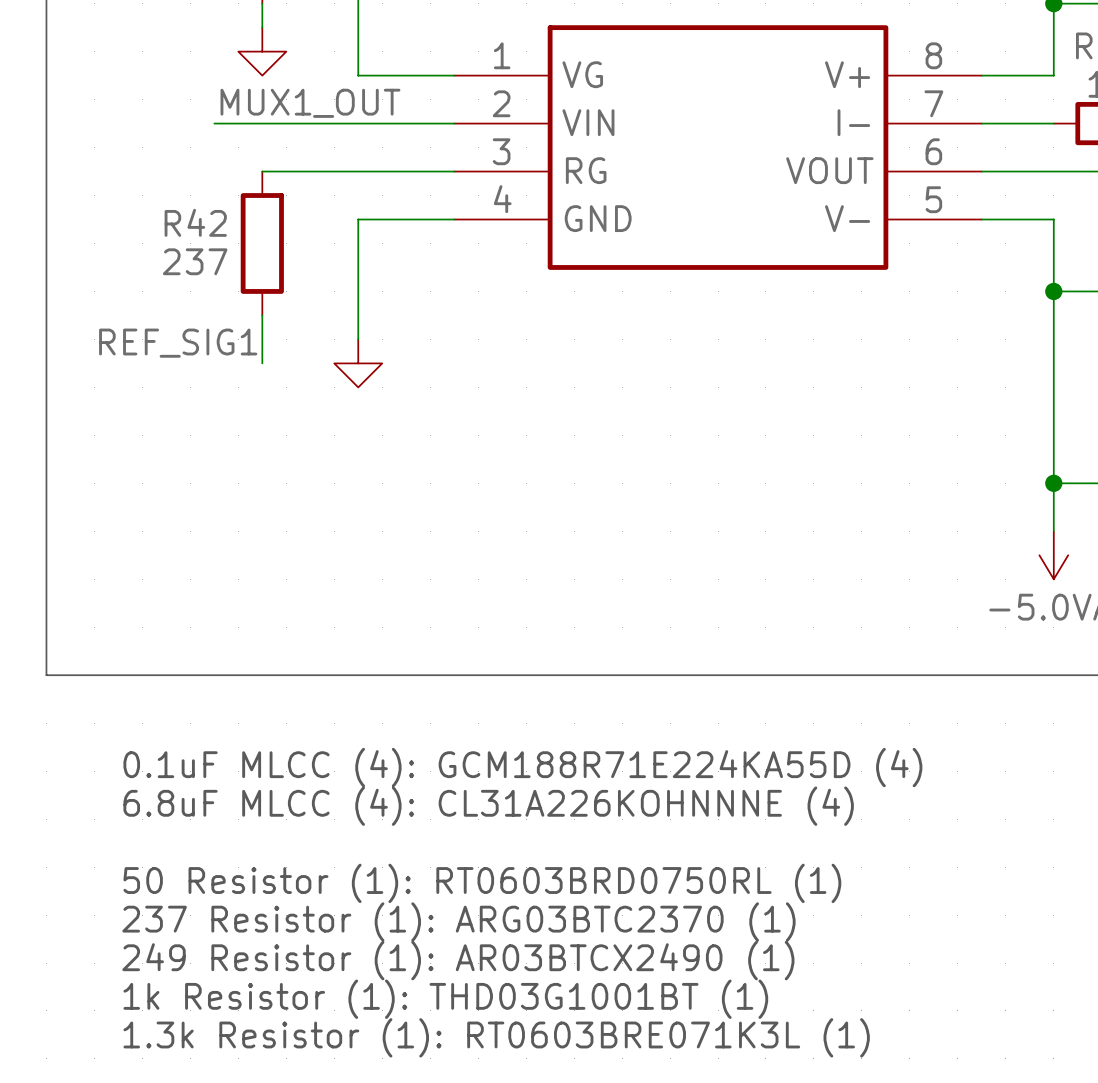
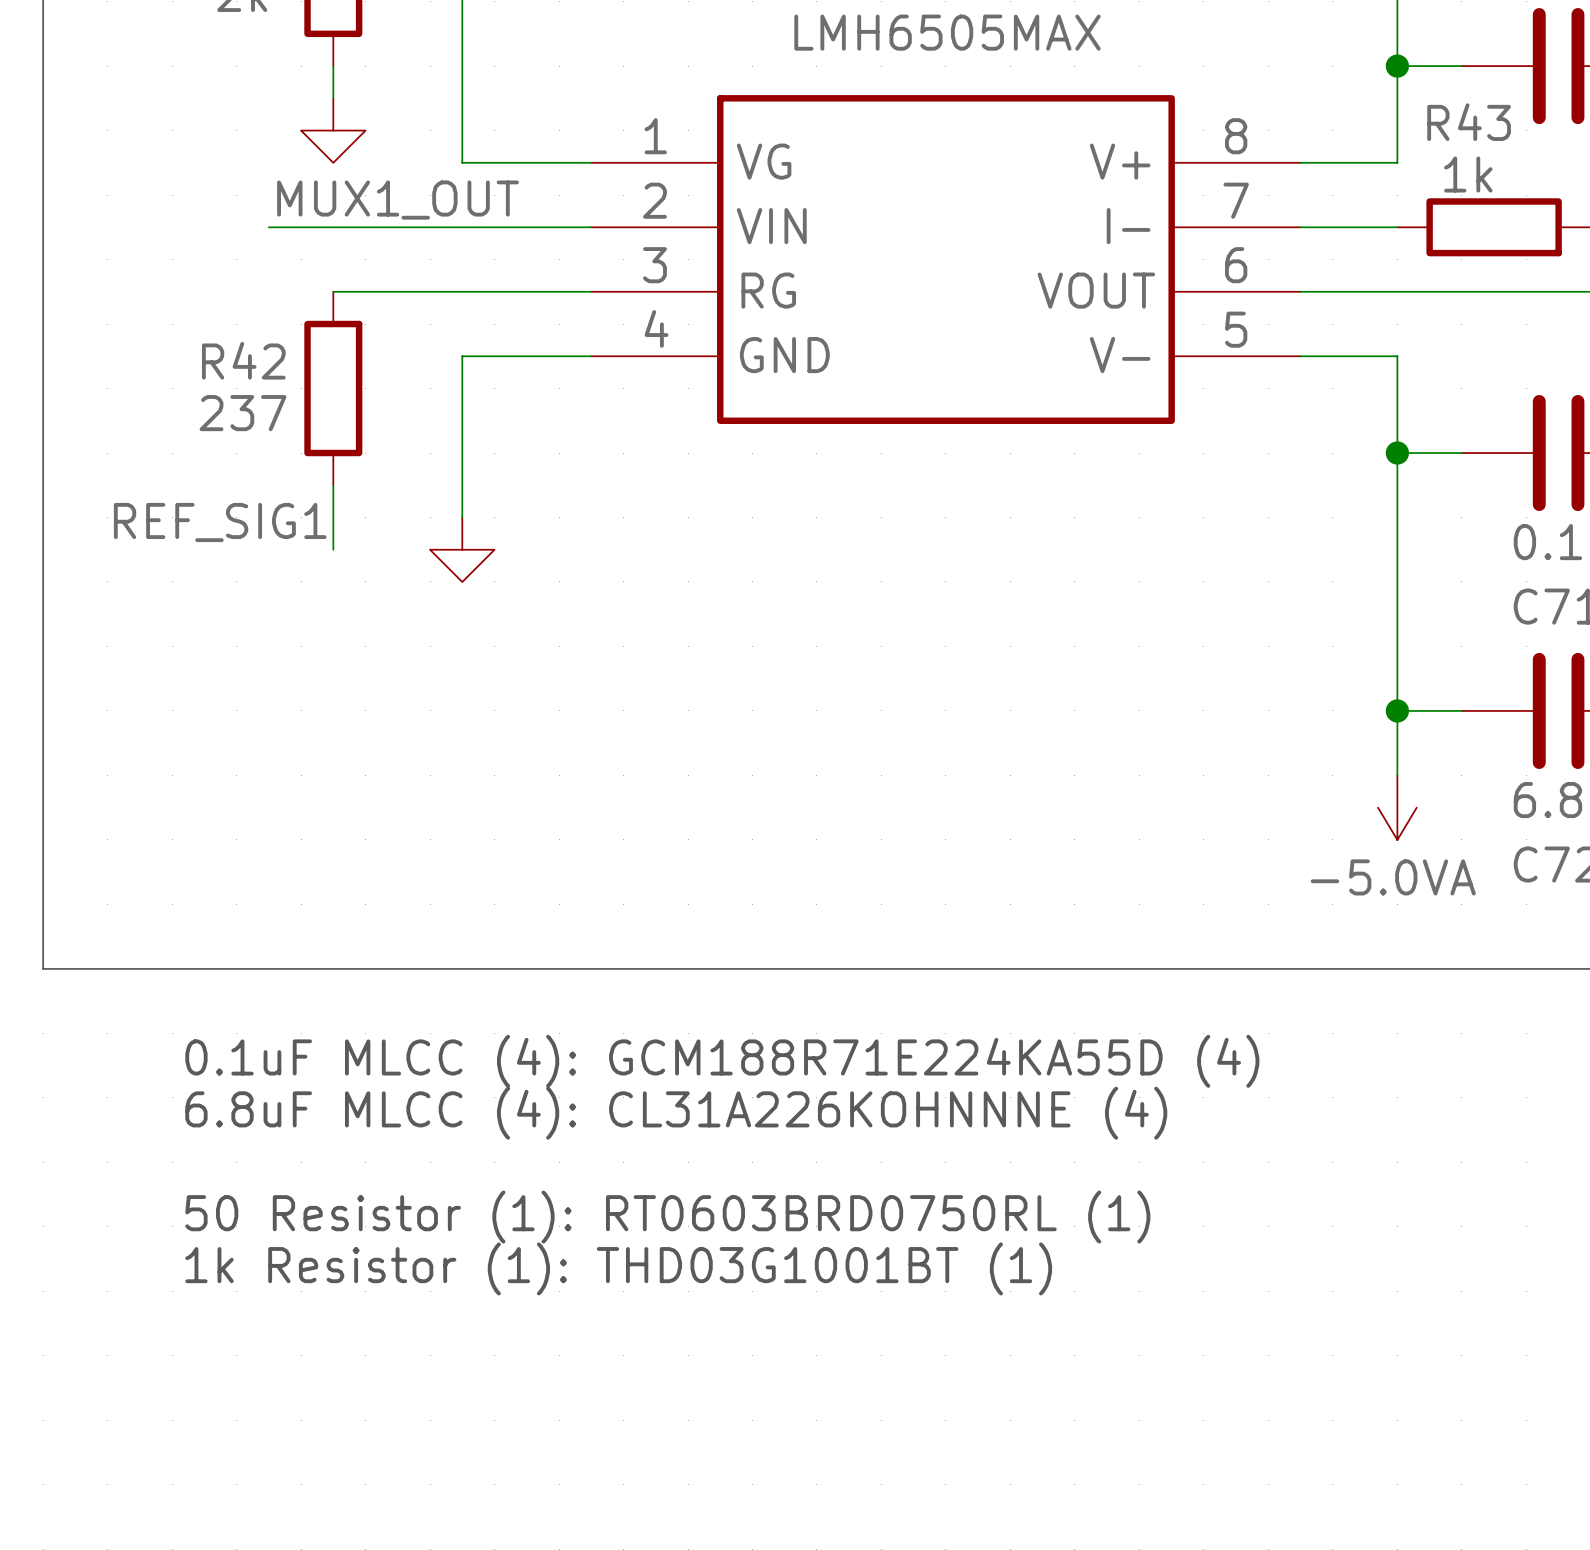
text position: 0.1uF MLCC (4): GCM188R71E224KA55D (4) (522, 767) -> 0.1uF MLCC (4): GCM188R71E224KA55D (4) (722, 1061)
text position: 6.8uF MLCC (4): CL31A226KOHNNNE (4) (488, 806) -> 6.8uF MLCC (4): CL31A226KOHNNNE (4) (676, 1113)
text position: 50 Resistor (1): RT0603BRD0750RL (1) (482, 883) -> 50 Resistor (1): RT0603BRD0750RL (1) (667, 1217)
text: 237 Resistor (1): ARG03BTC2370 (1) (458, 922) -> none
text: 249 Resistor (1): AR03BTCX2490 (1) (458, 960) -> none
text position: 1k Resistor (1): THD03G1001BT (1) (445, 999) -> 1k Resistor (1): THD03G1001BT (1) (618, 1268)
text: 1.3k Resistor (1): RT0603BRE071K3L (1) (496, 1037) -> none

